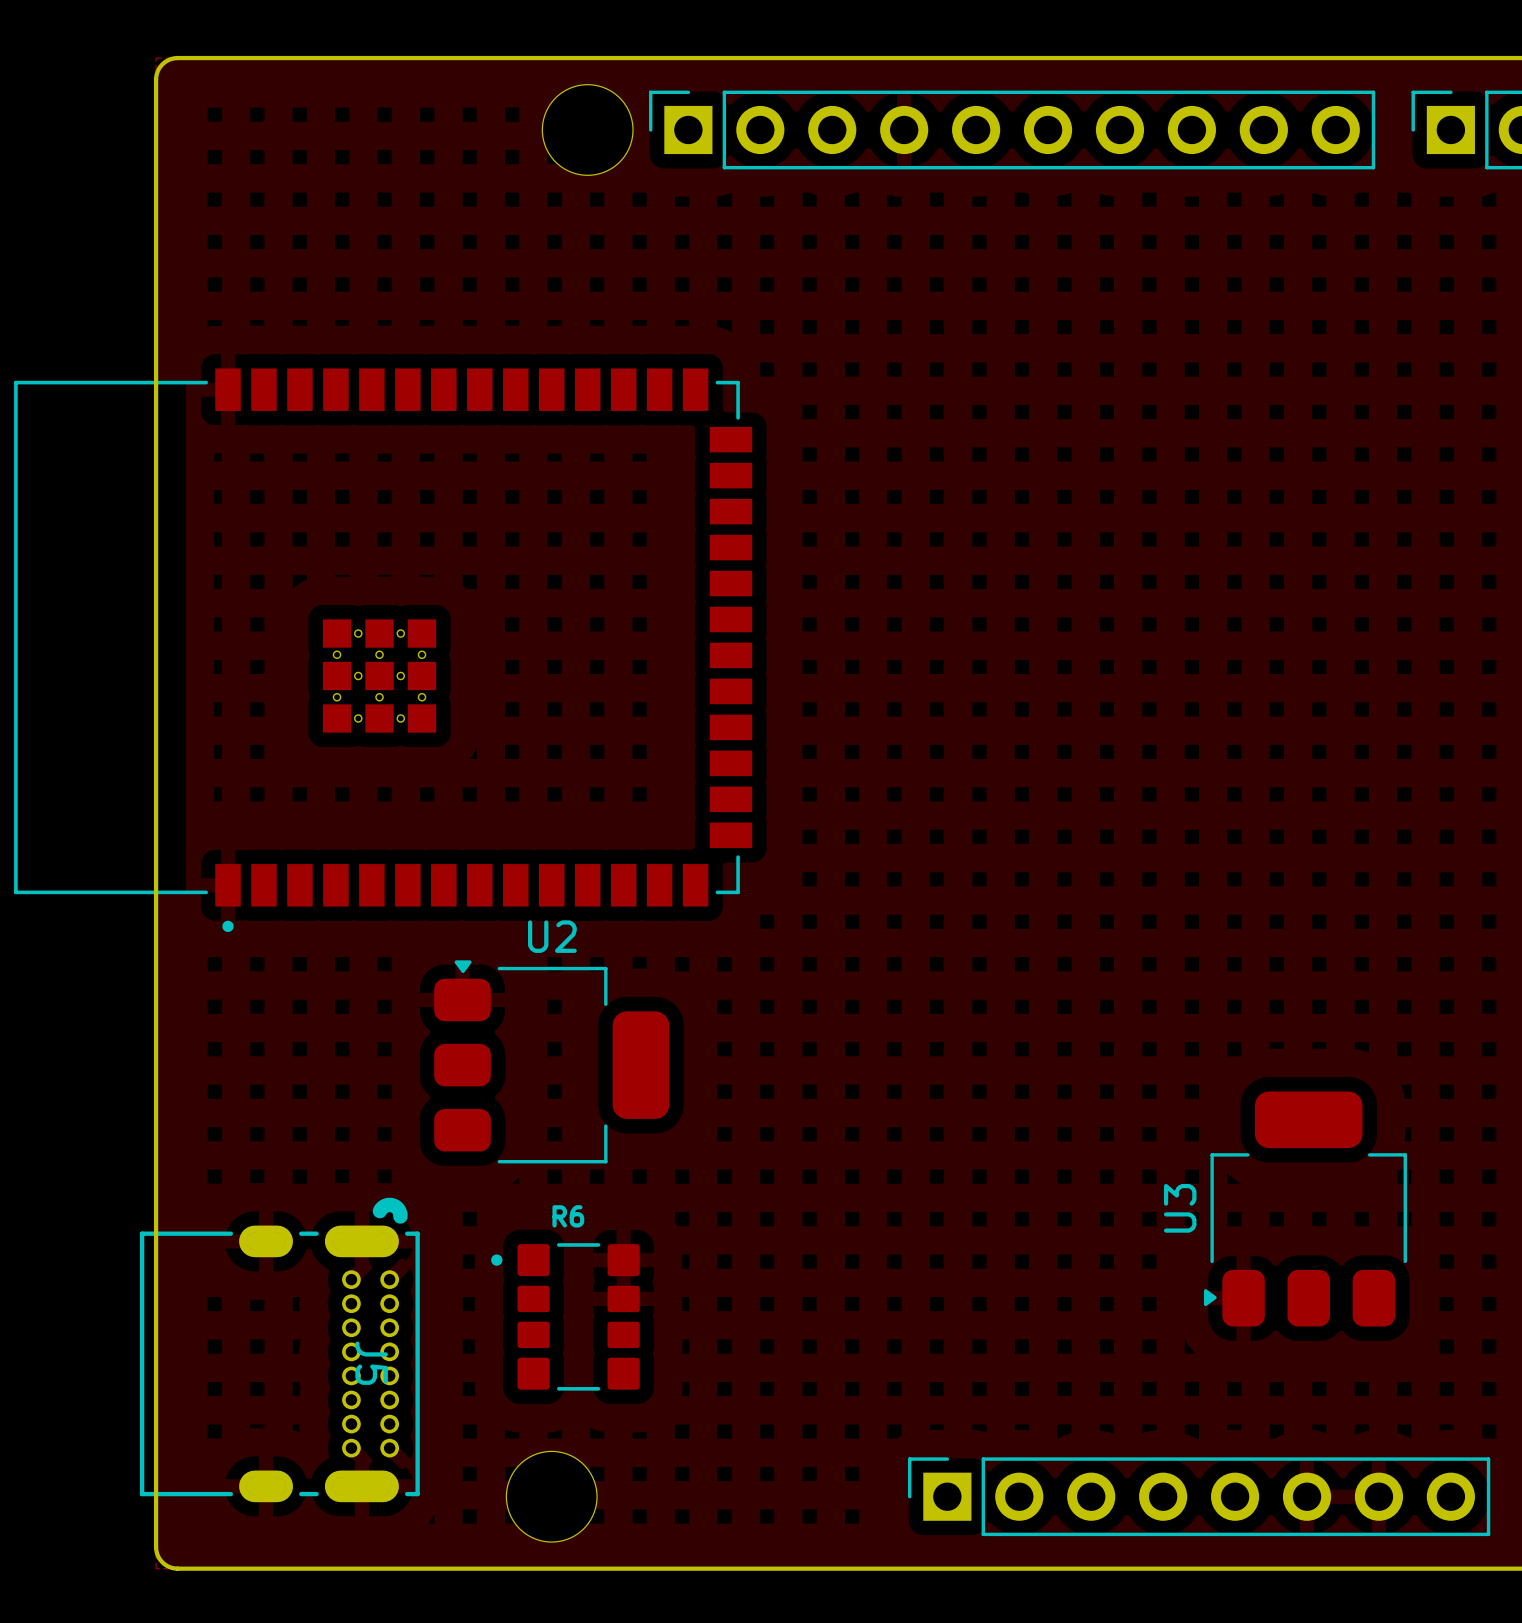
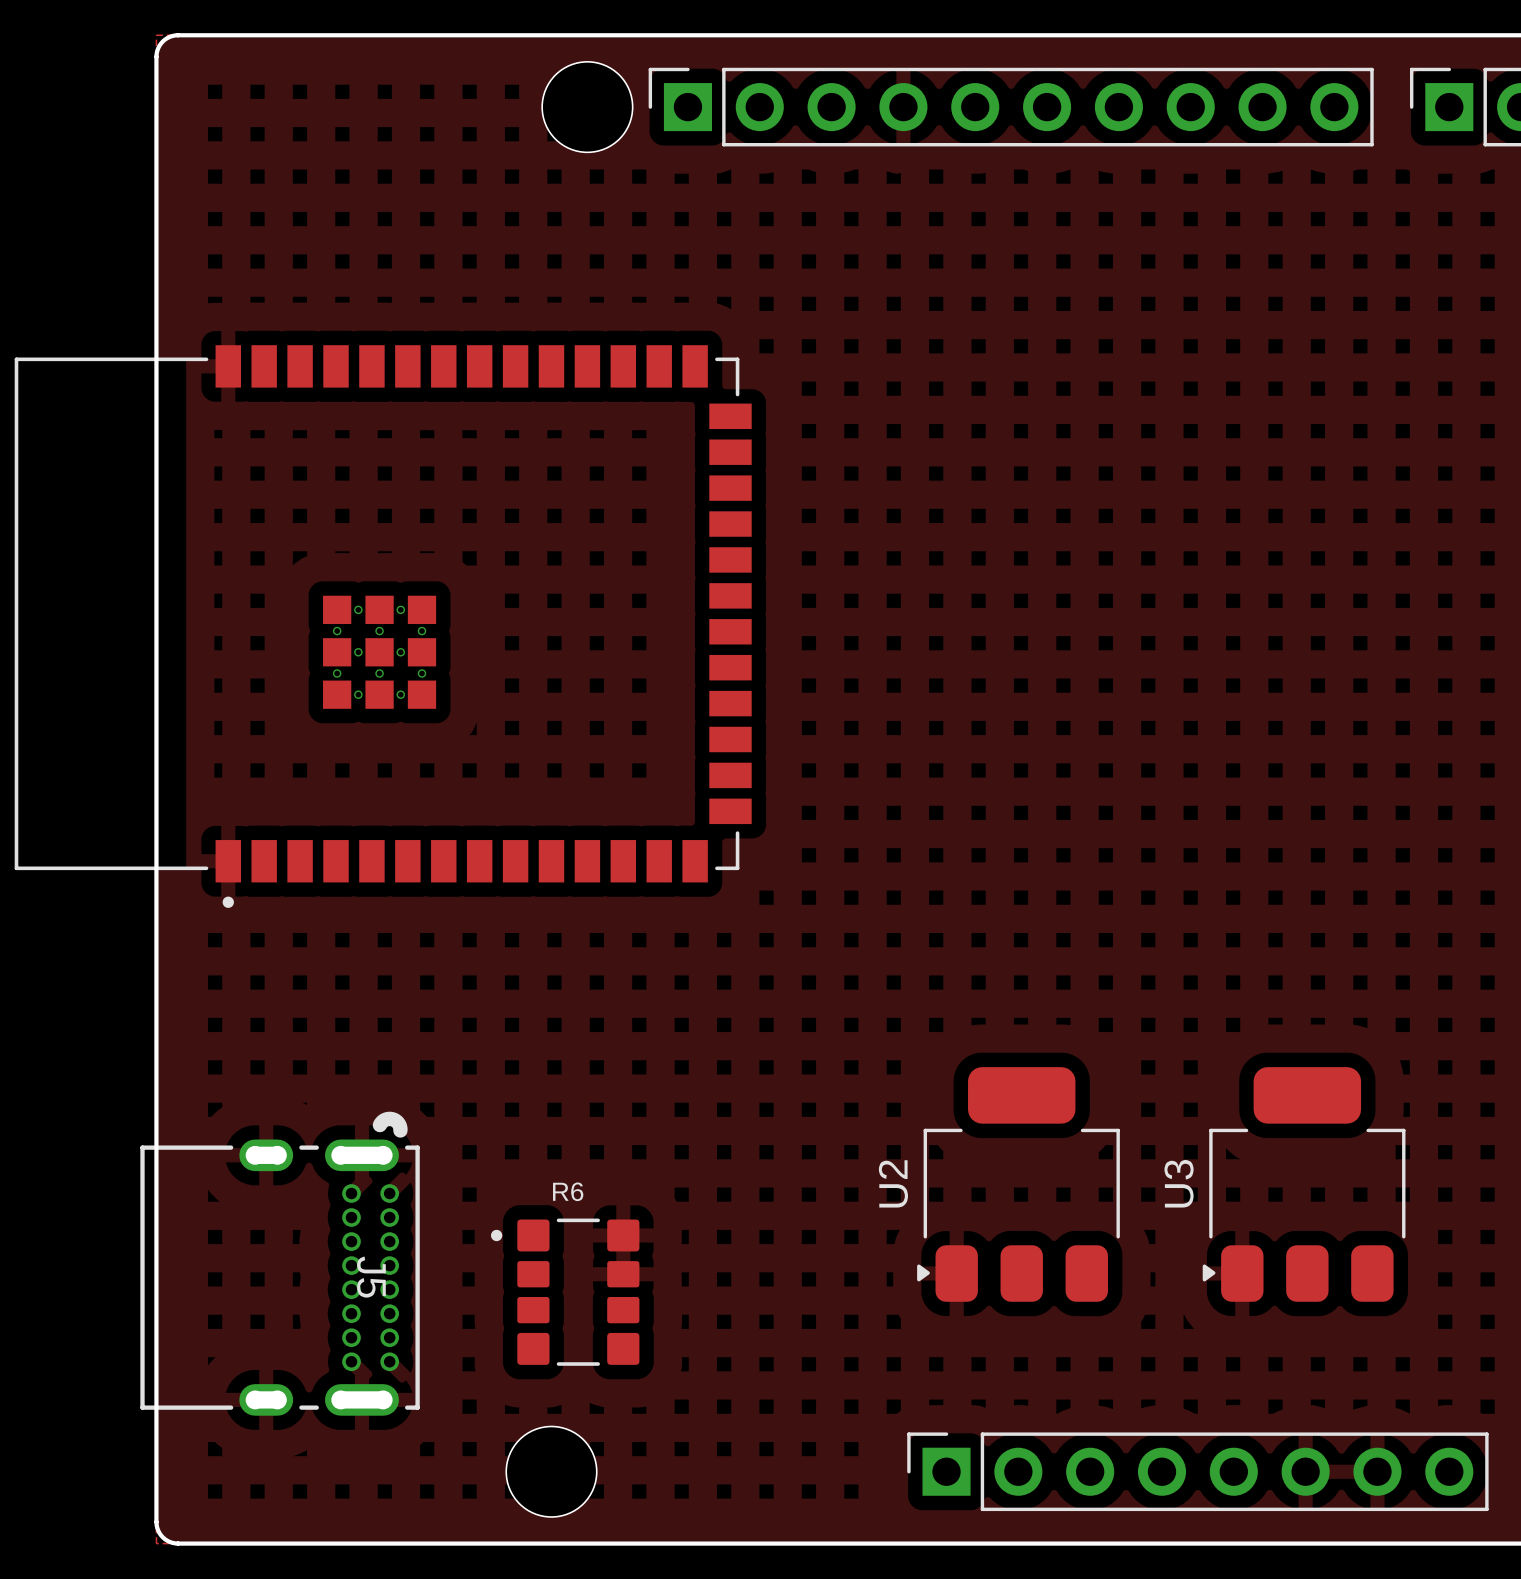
U2 rotation: 0° (551, 1061) -> 90° counterclockwise (1018, 1184)
U2 position: (551, 1061) -> (1018, 1184)
J5 position: (279, 1349) -> (280, 1263)

